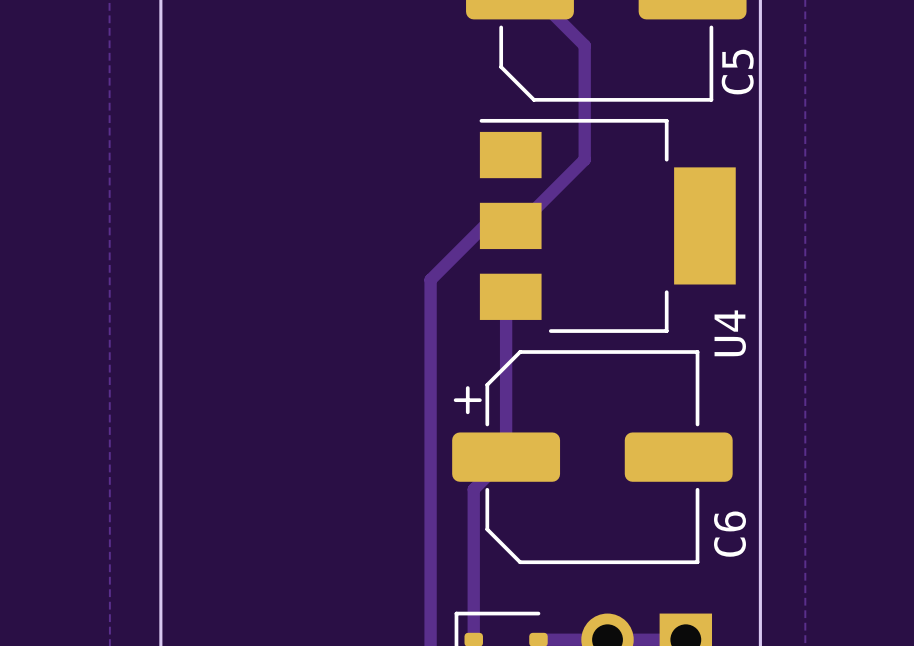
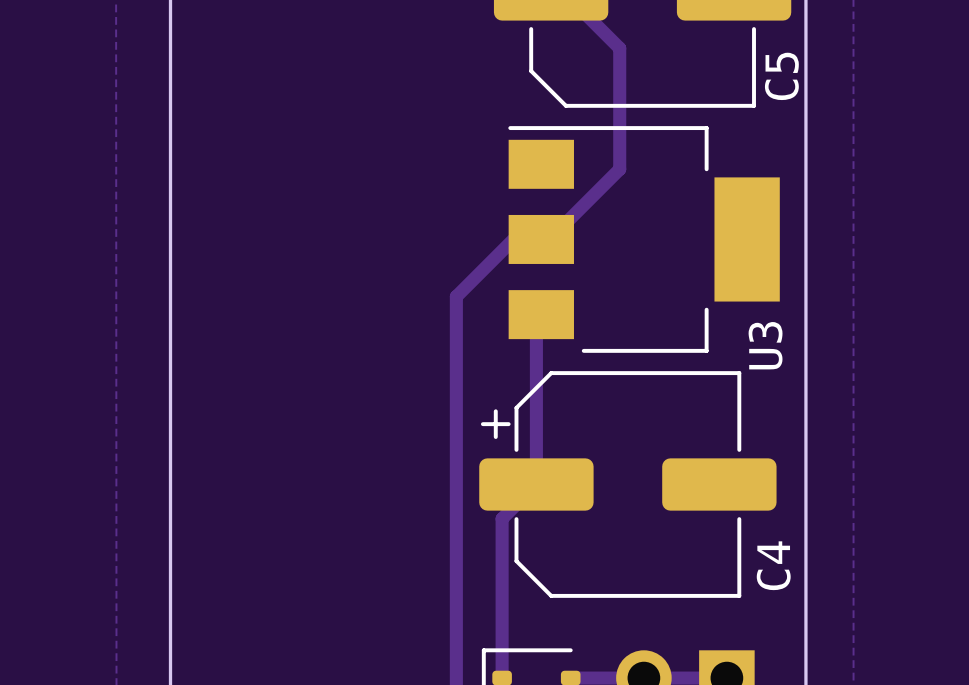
U4 name: U4 (730, 333) -> U3 (765, 345)
C6 name: C6 (729, 534) -> C4 (773, 565)

